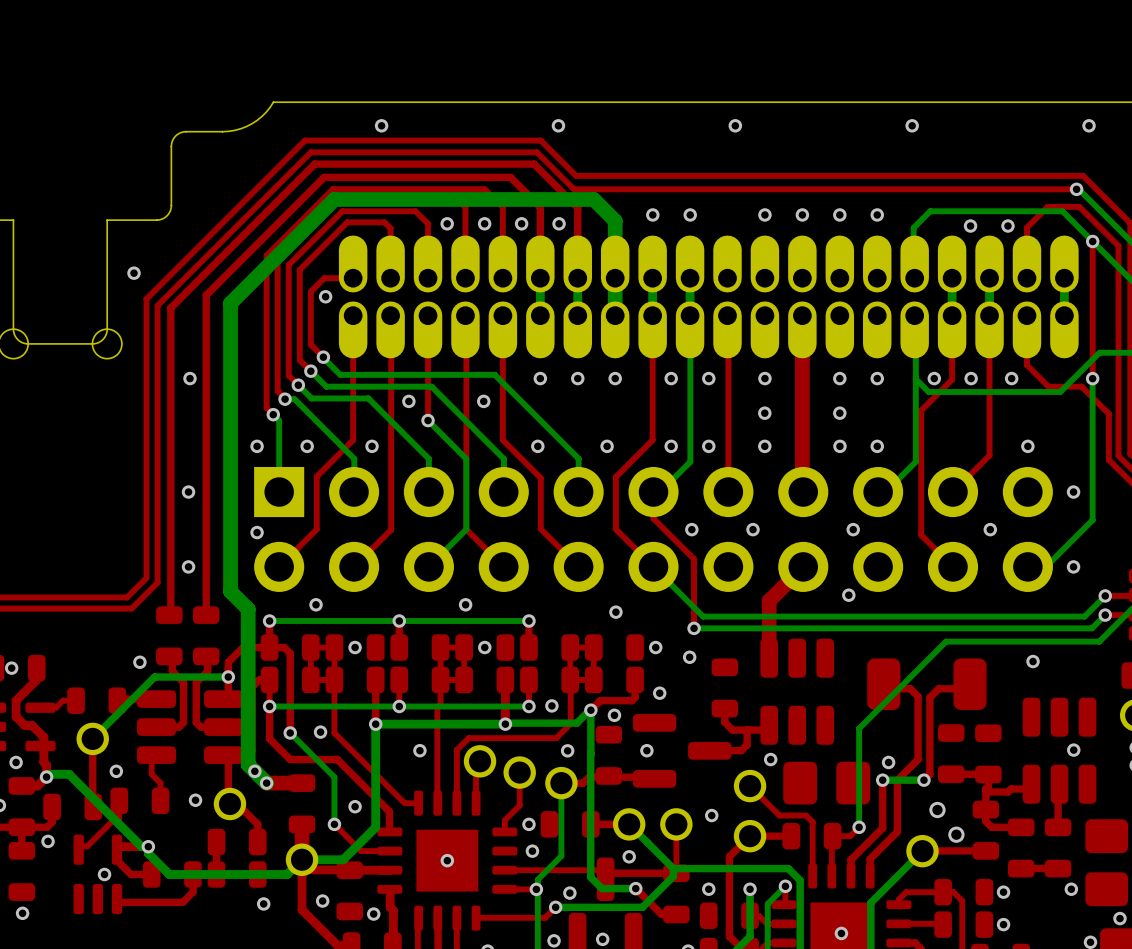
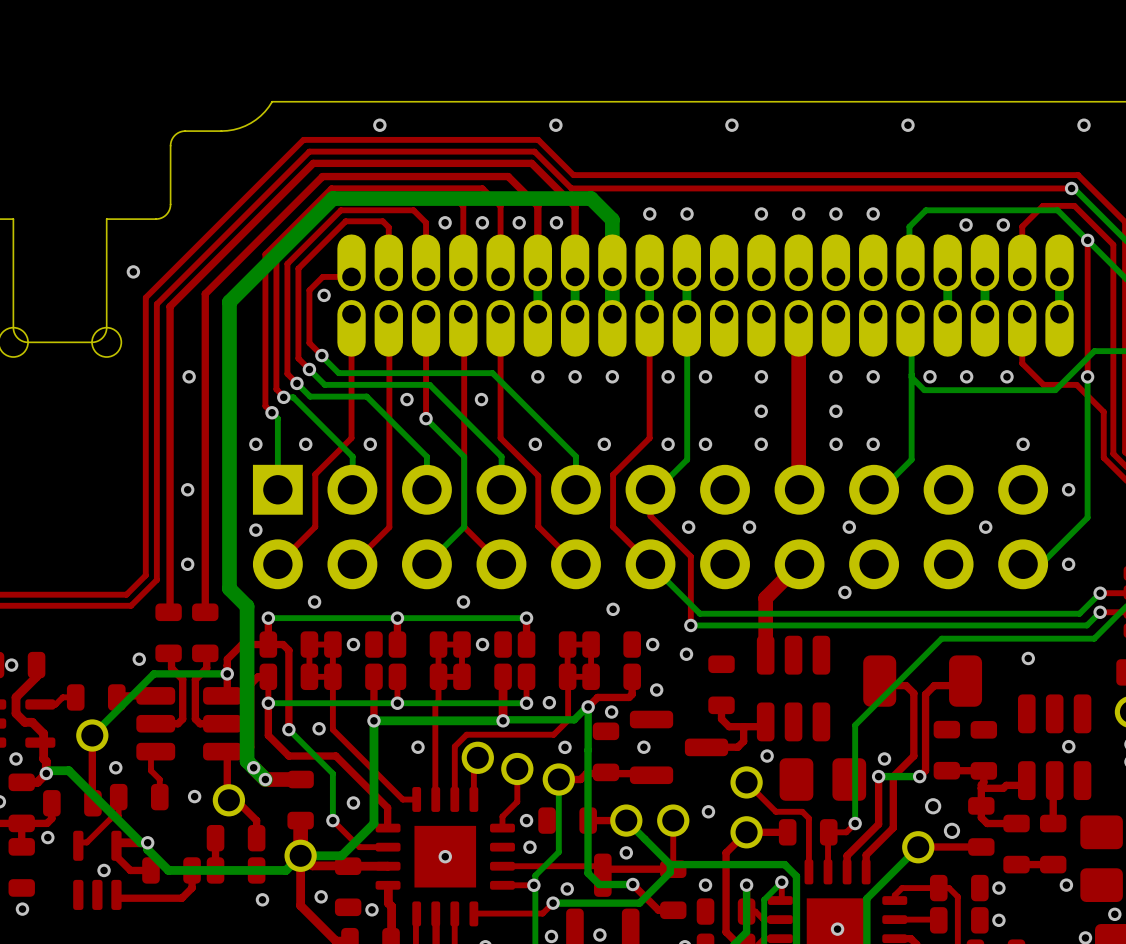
top track: (727, 315) (728, 492) -> none
top track: (952, 315) (952, 379) (921, 410) (921, 535) (953, 566) -> none
top track: (989, 315) (989, 455) (953, 492) -> none

